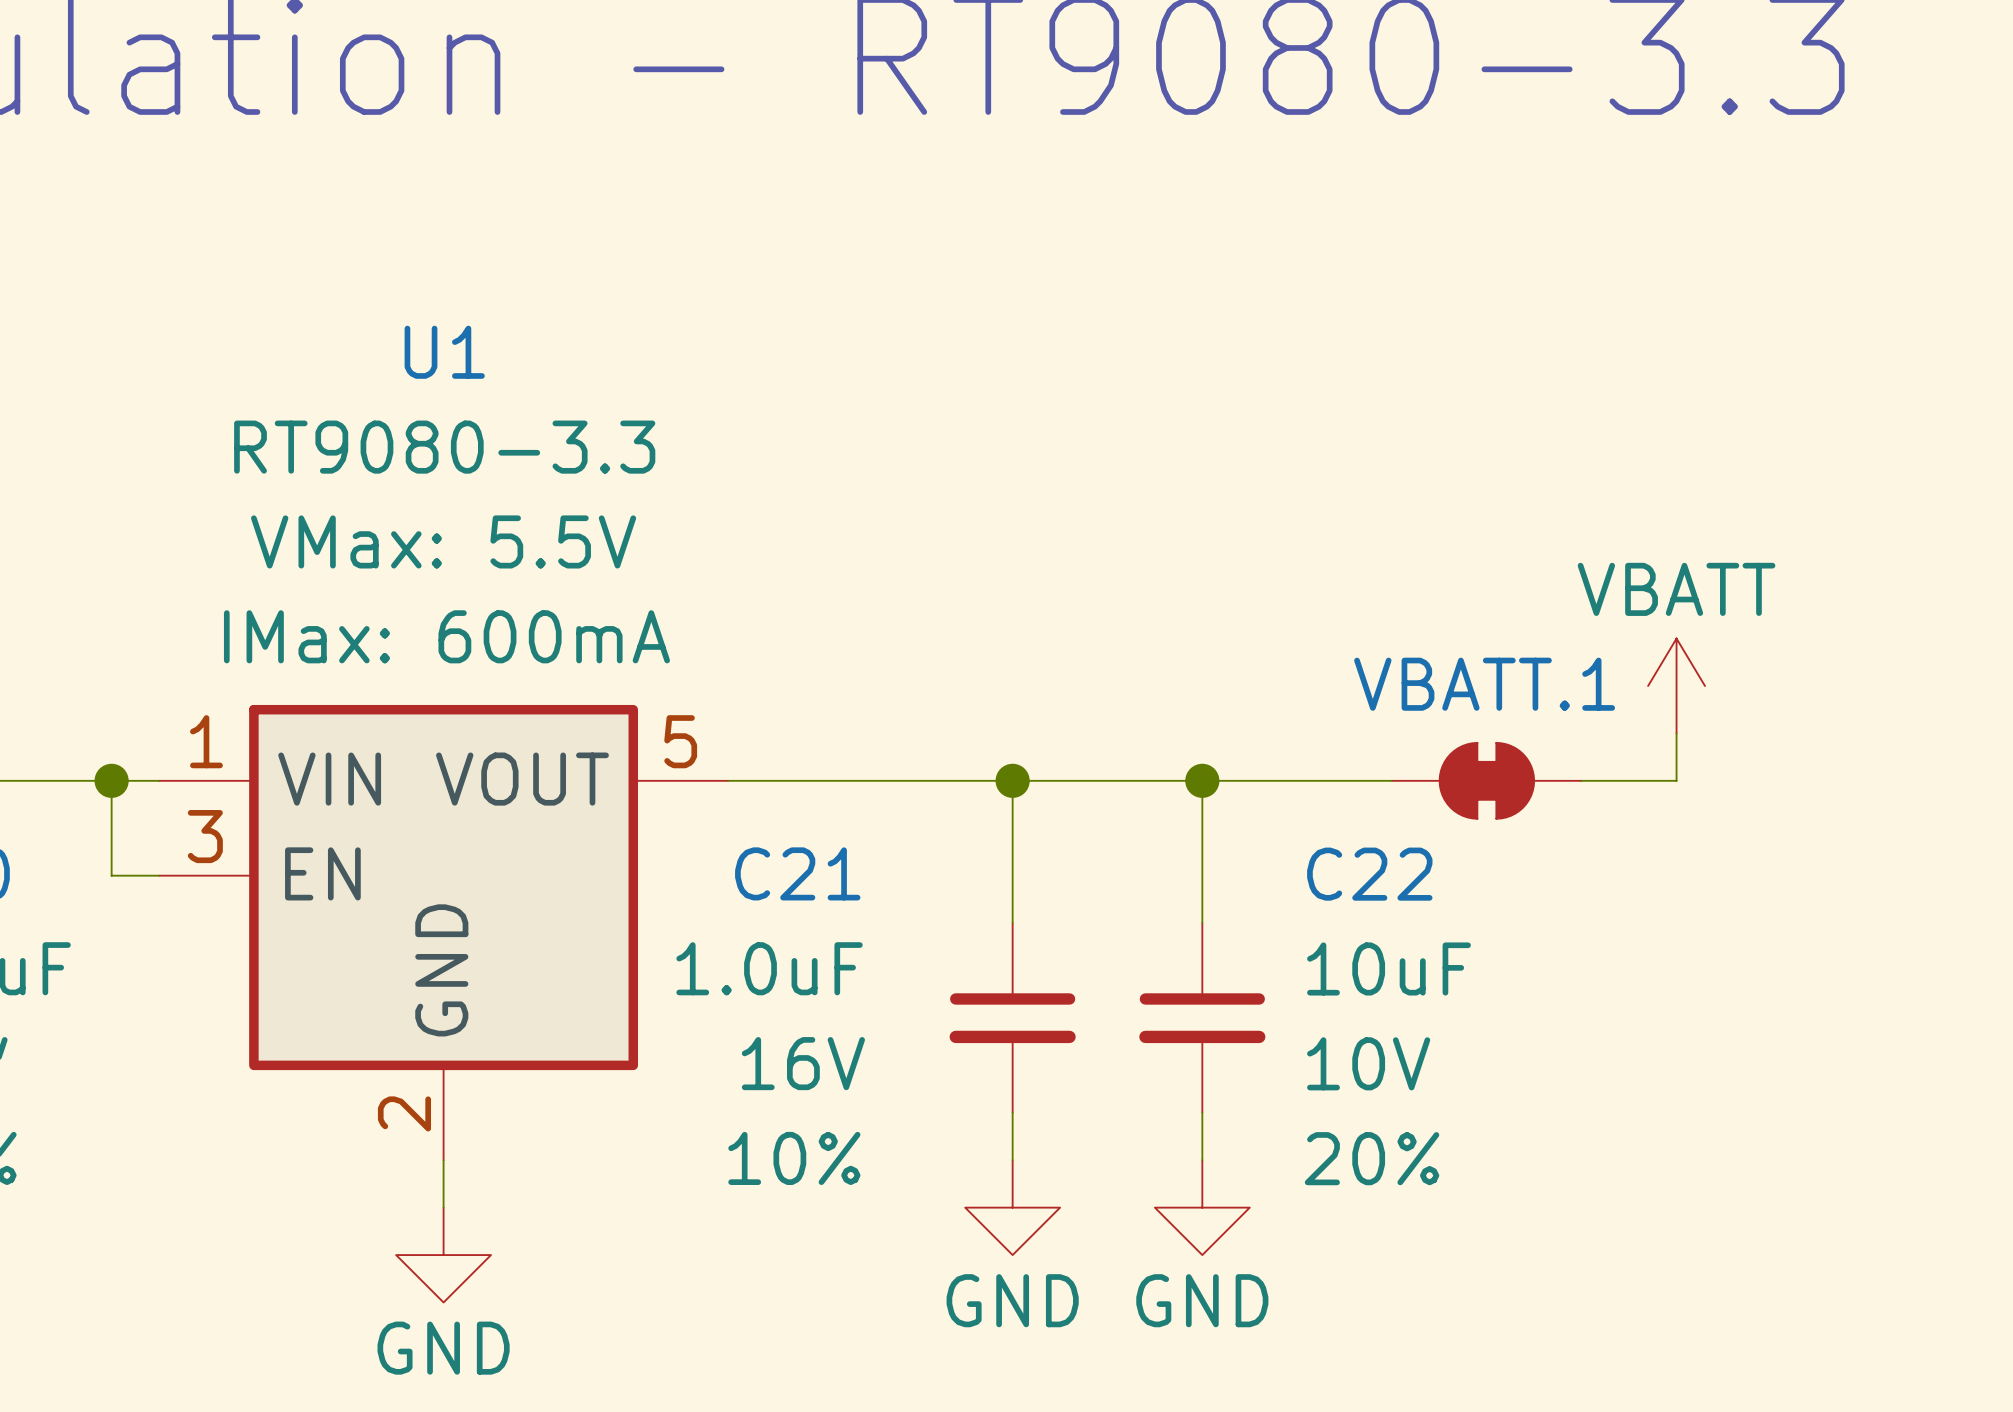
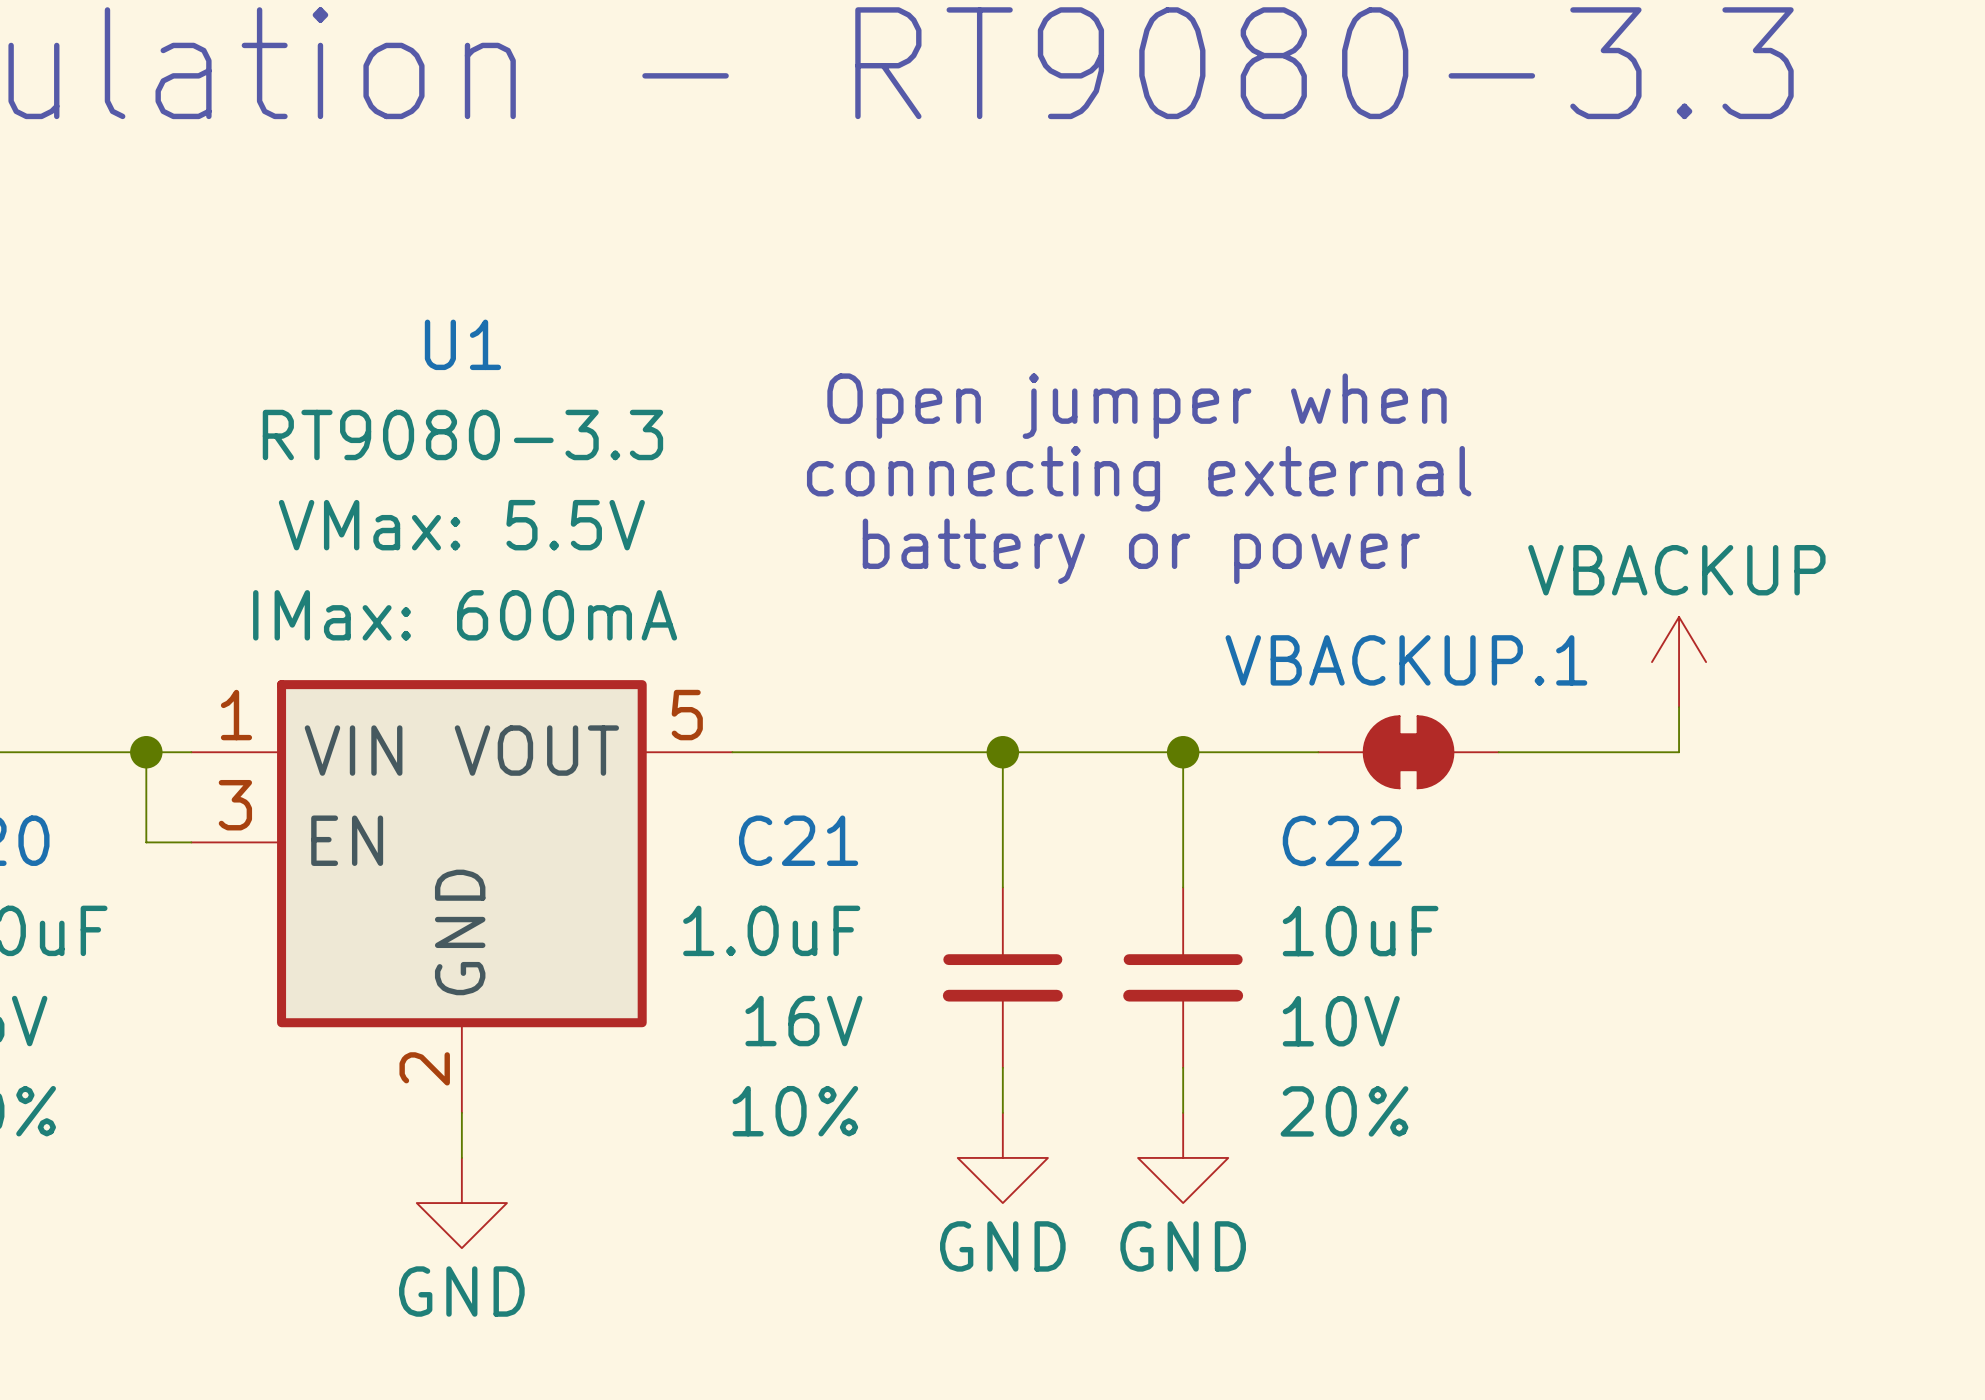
text: none -> Open jumper when (1137, 406)
text: none -> connecting external (1139, 478)
text: none -> battery or power (1141, 551)
power symbol: VBATT (1676, 685) -> none
power symbol: none -> VBACKUP (1679, 662)
wire: (1676, 733) (1676, 780) -> (1679, 707) (1679, 752) (1633, 752)
VBACKUP.1: none -> (1408, 752)
VBATT.1: (1486, 780) -> none

